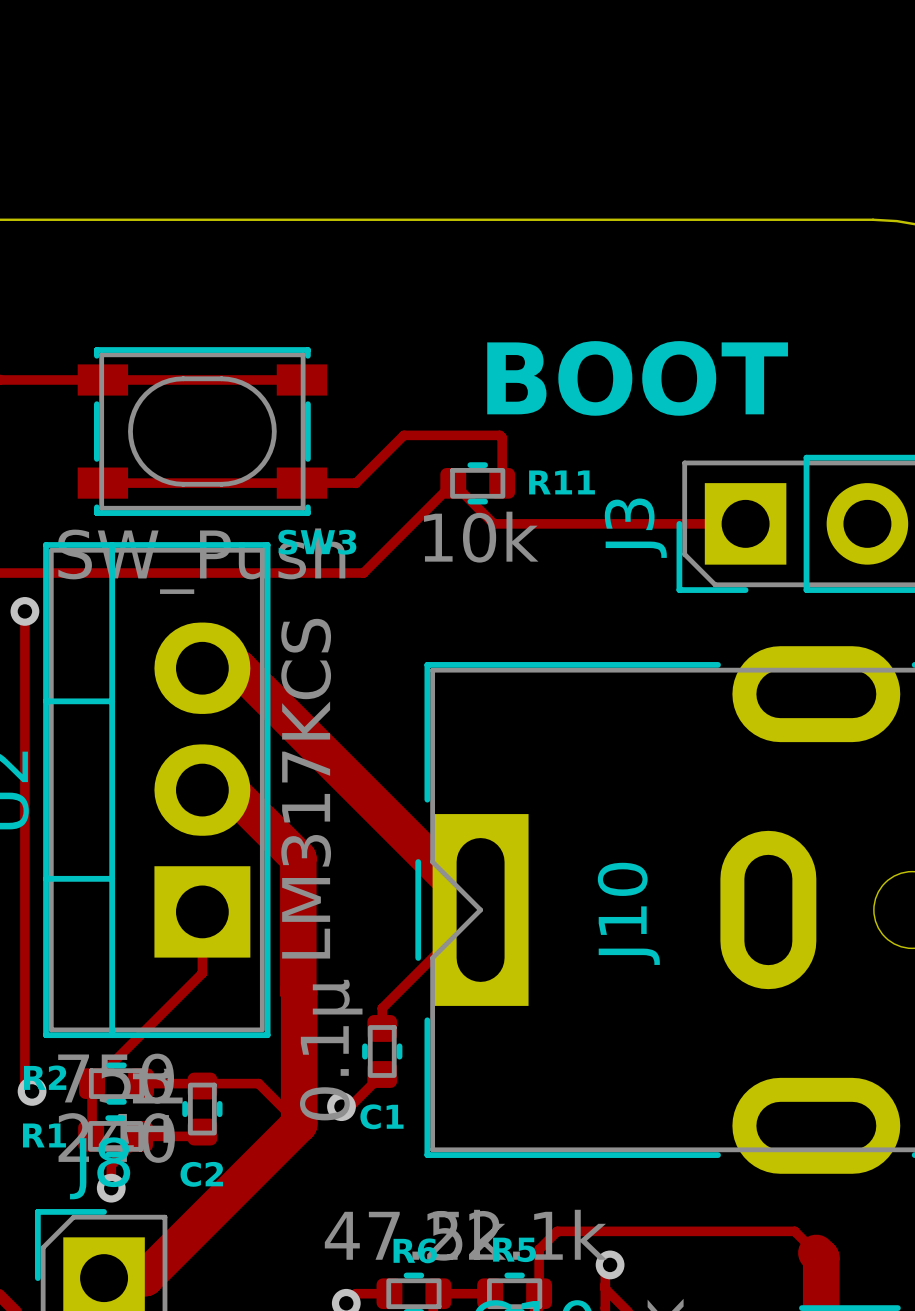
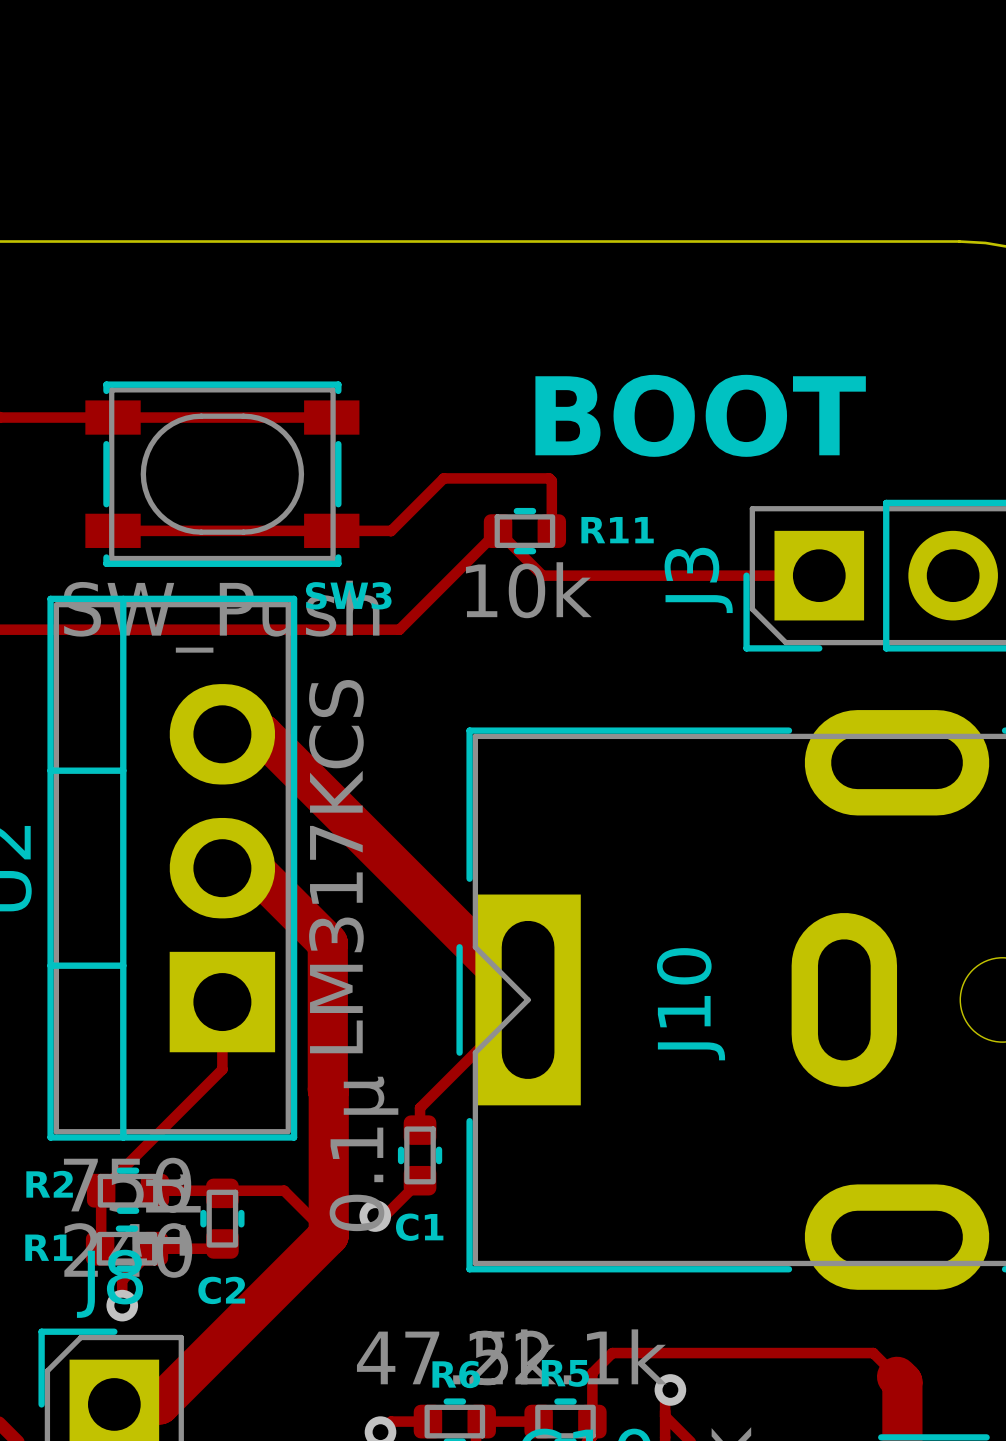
track: (24, 611) (24, 1084) (32, 1091) -> none
via: (24, 611) -> none
via: (32, 1091) -> none

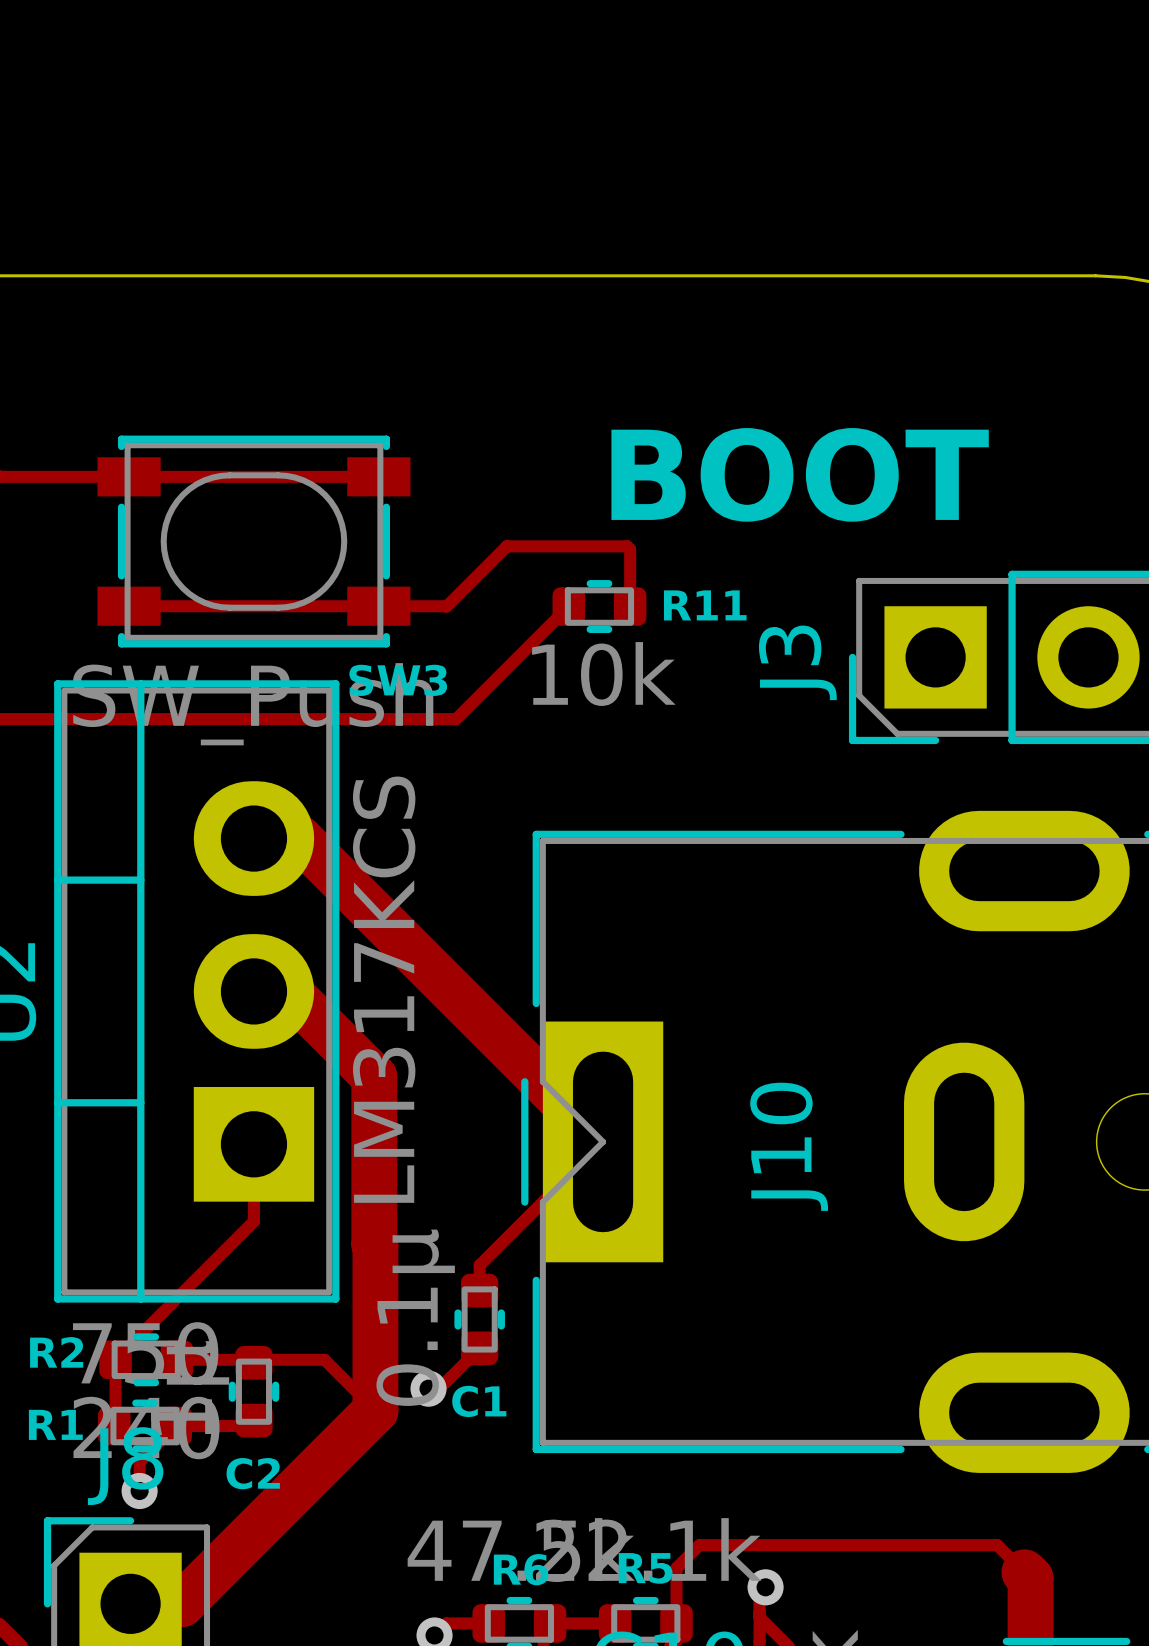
track: (498, 531) (542, 575) (819, 575) -> none

